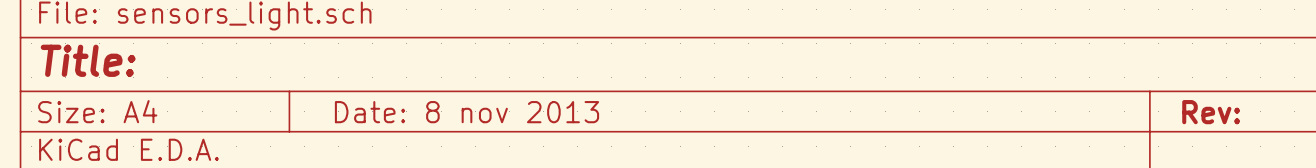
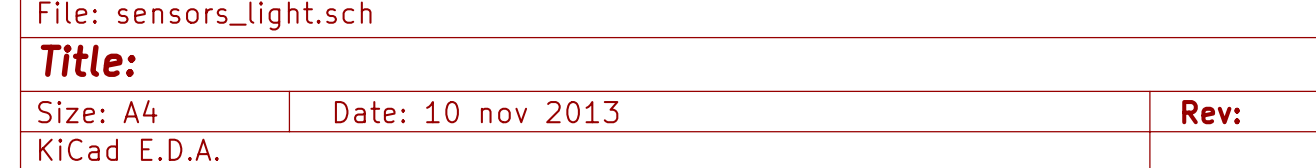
title block: Date: 8 nov 2013 (466, 112) -> Date: 10 nov 2013 (476, 112)

